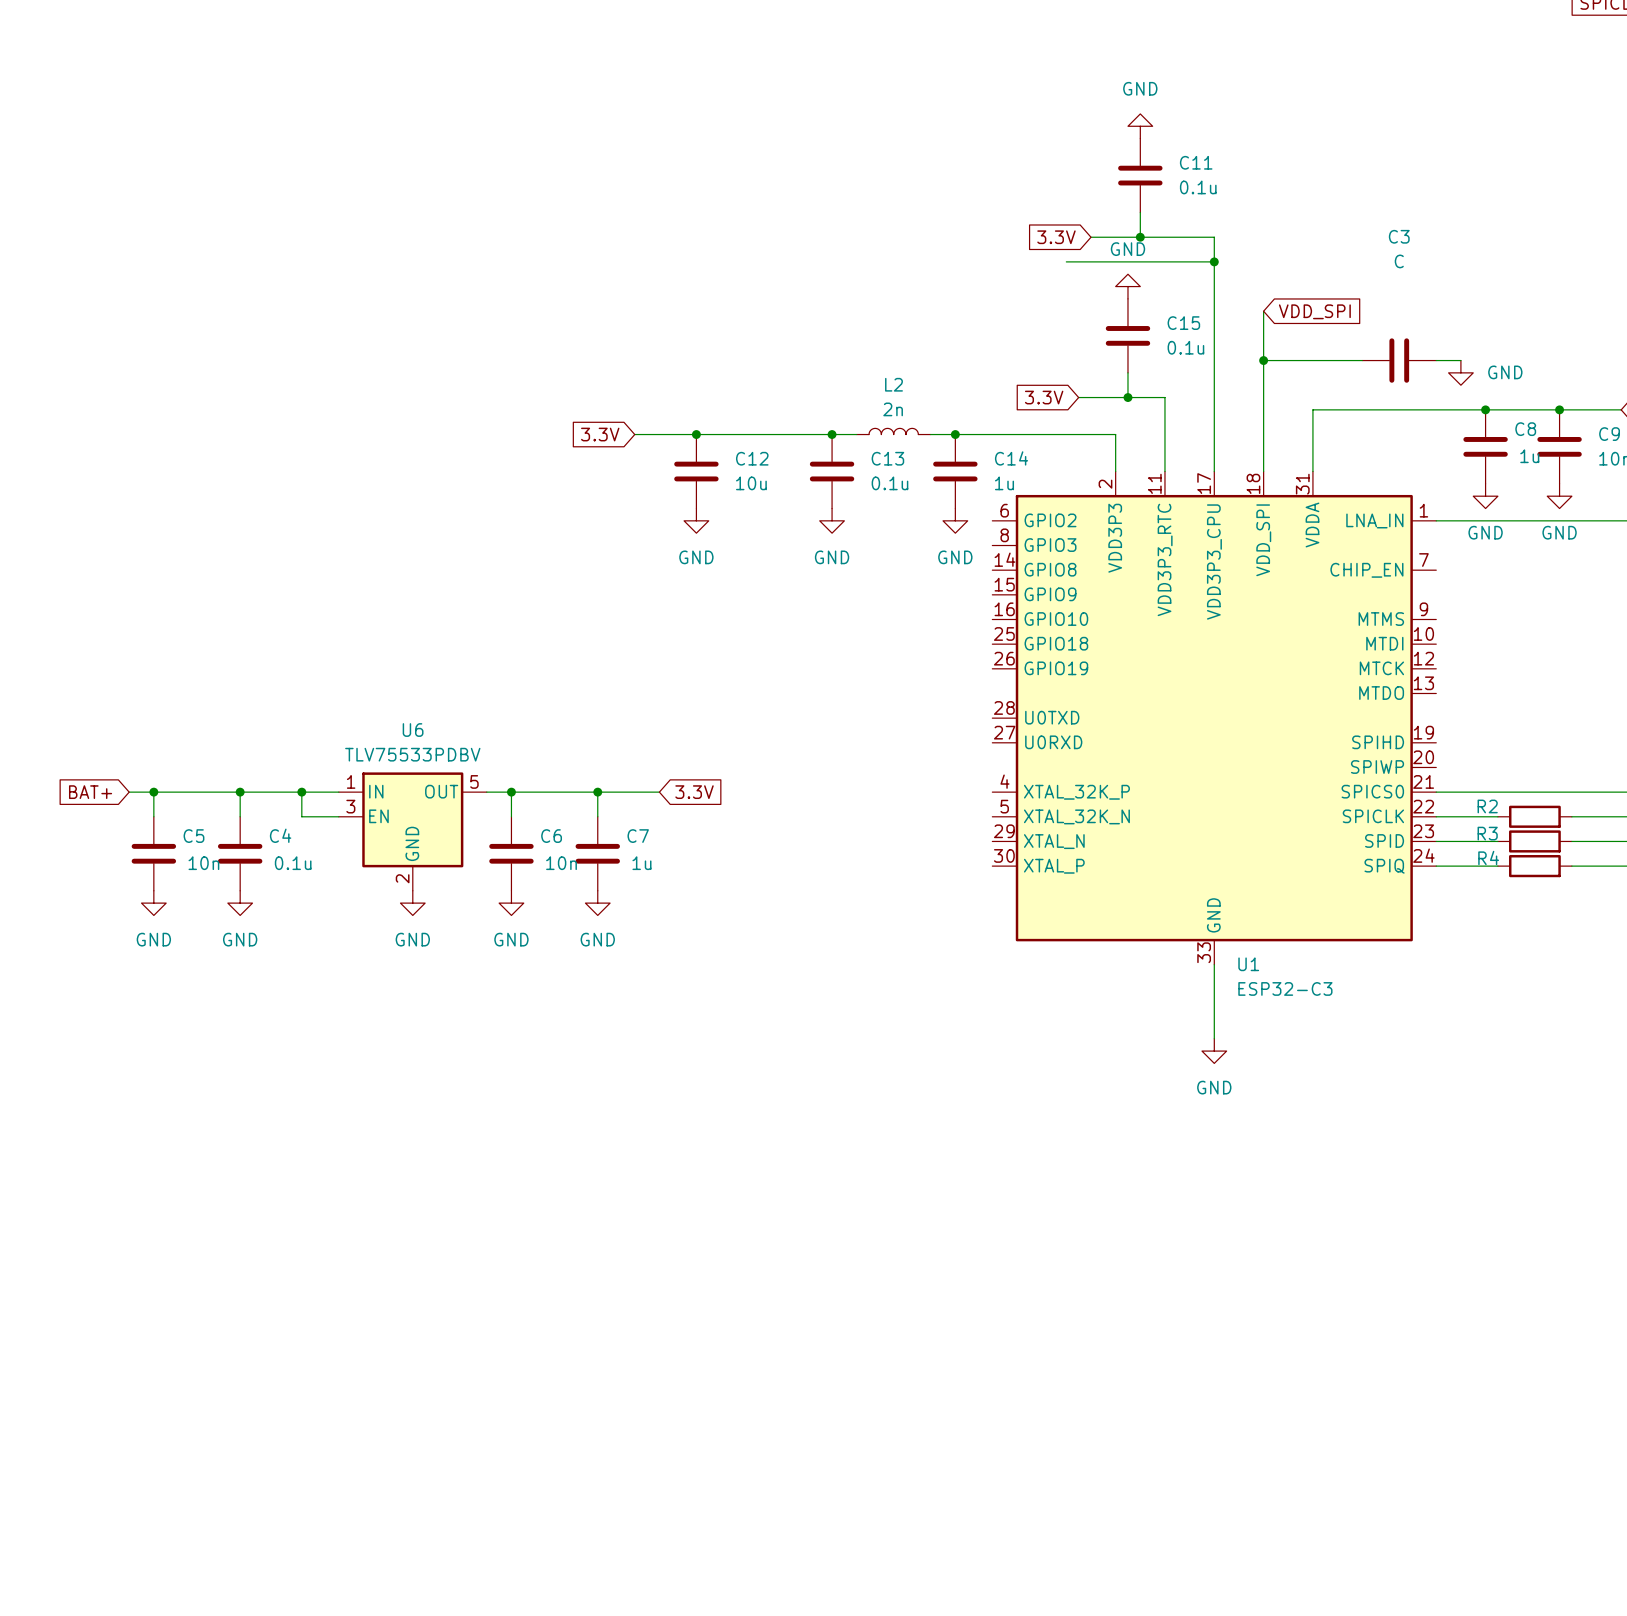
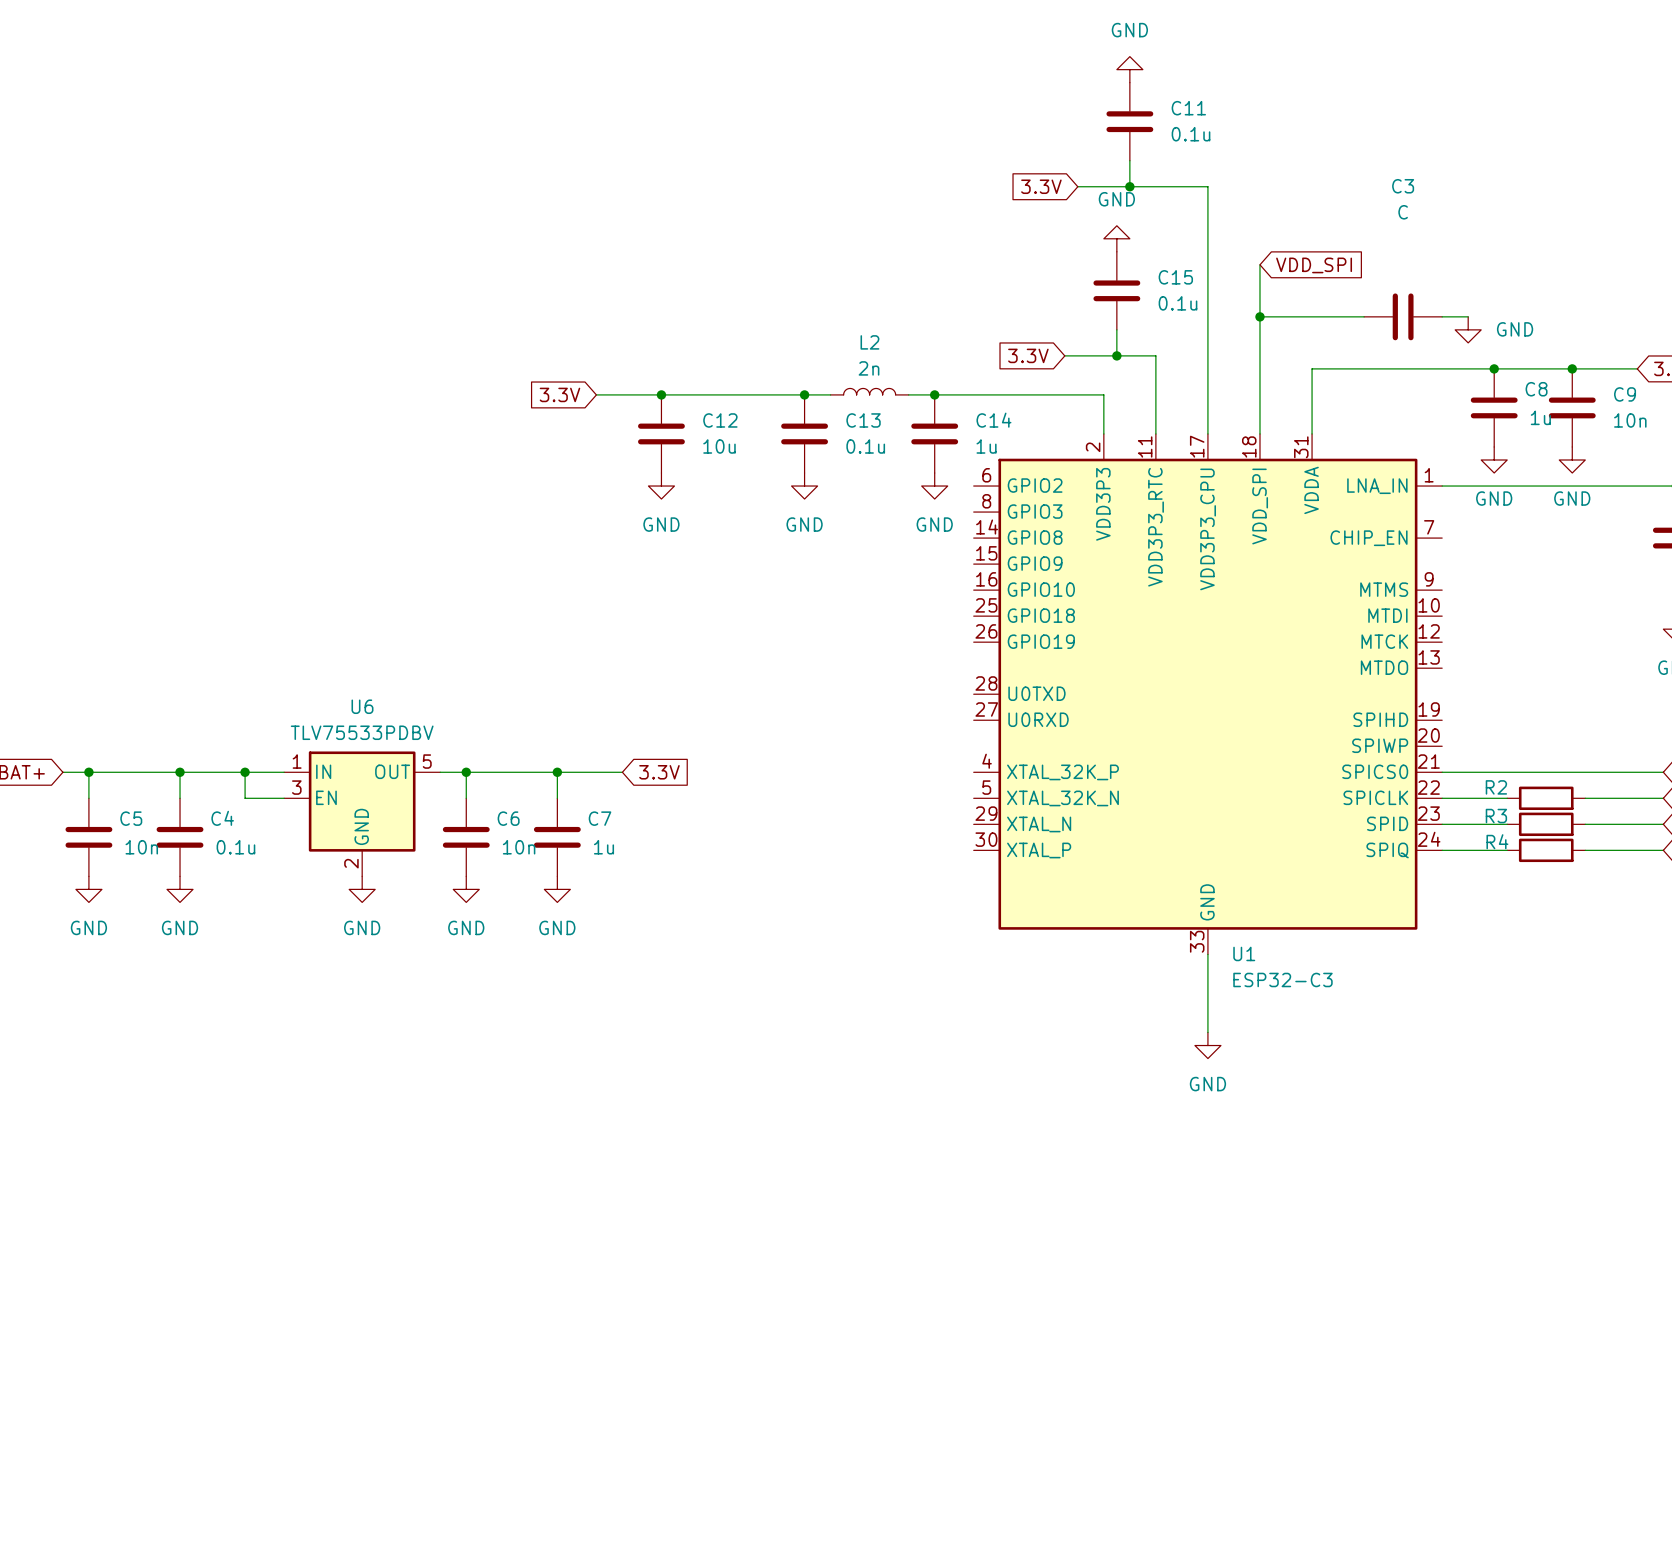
wire: (1066, 261) (1214, 261) -> none
junction: (1214, 261) -> none

